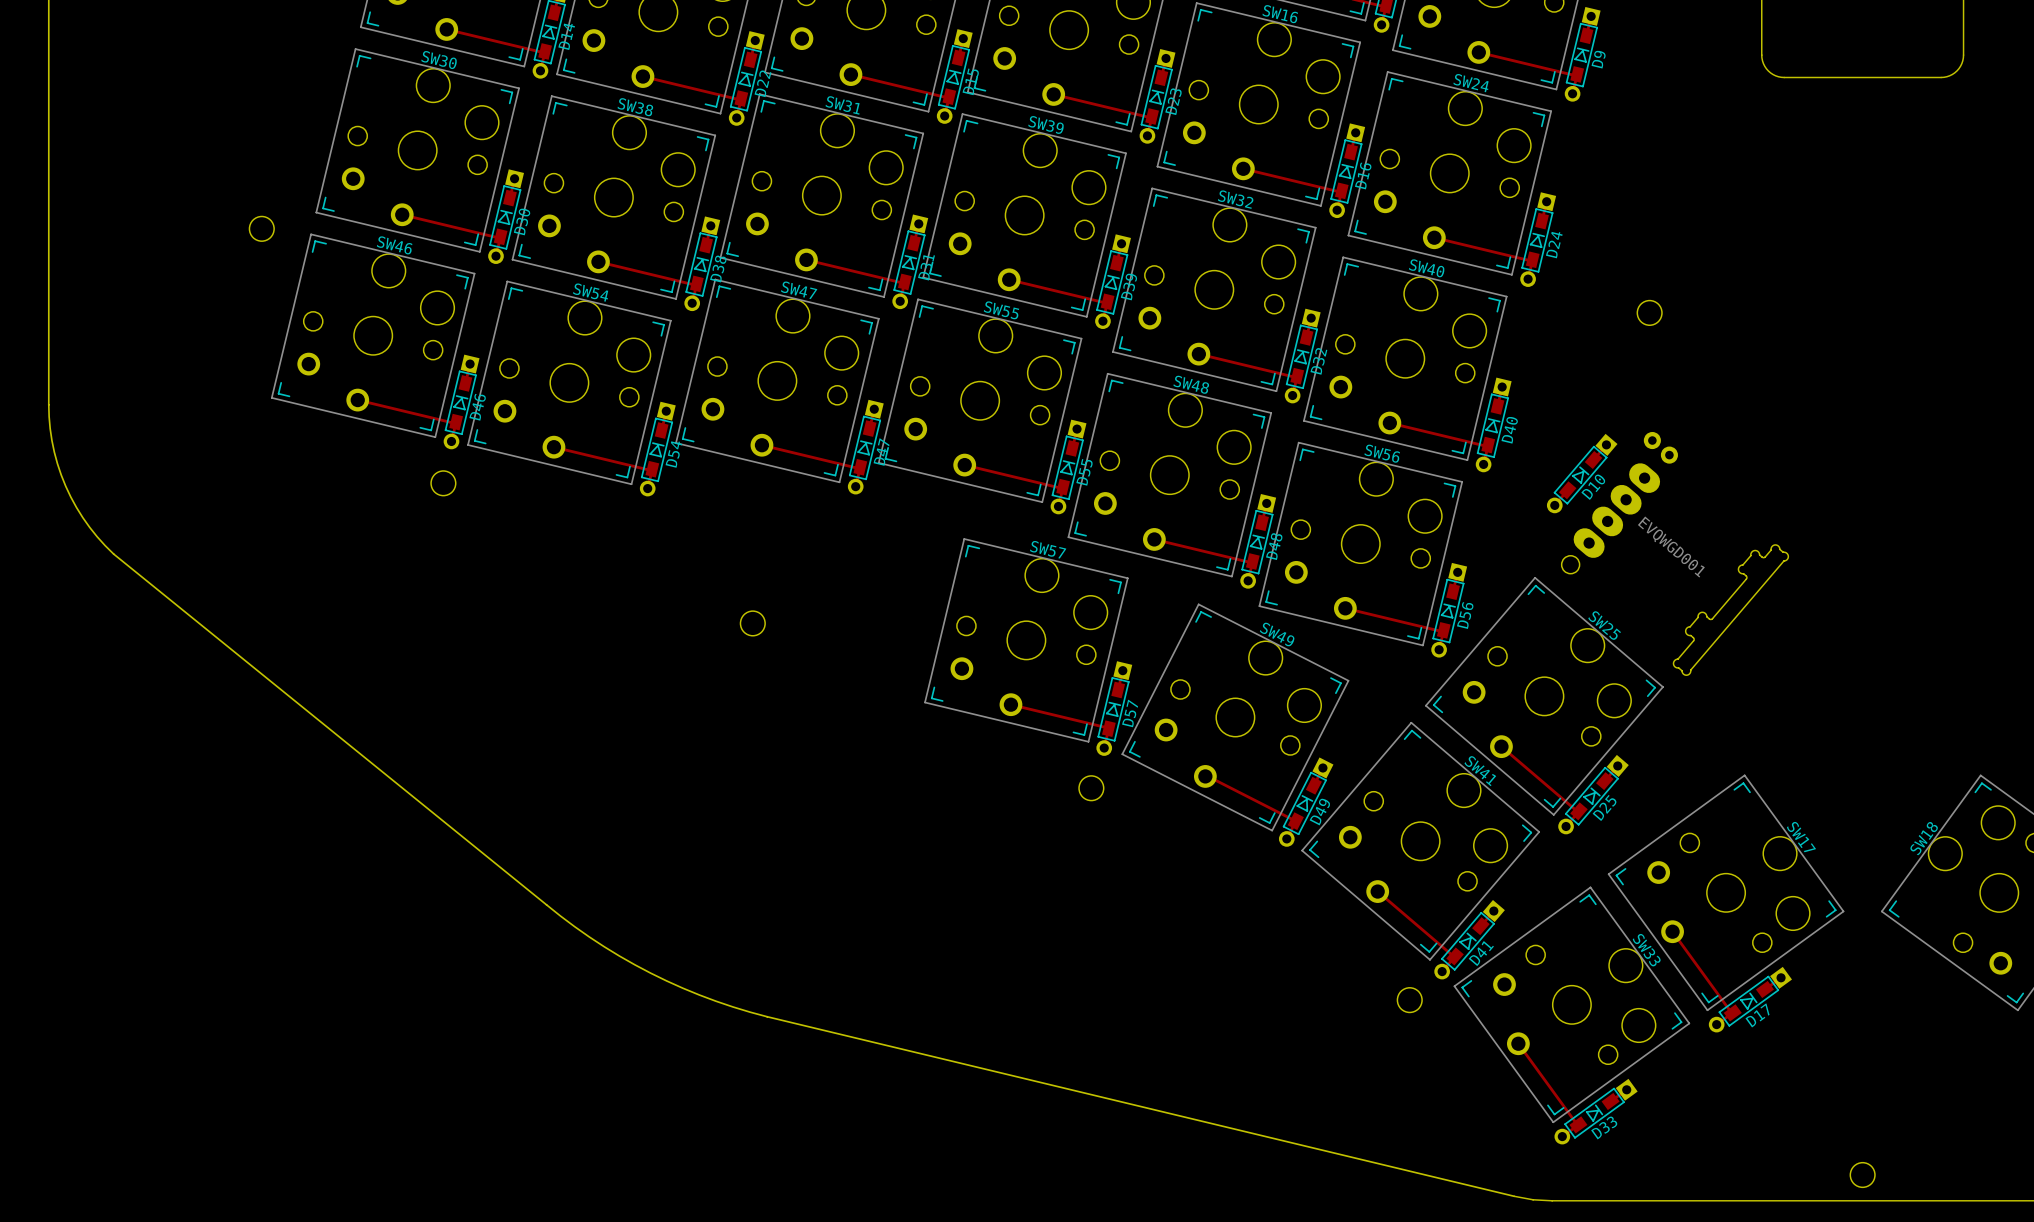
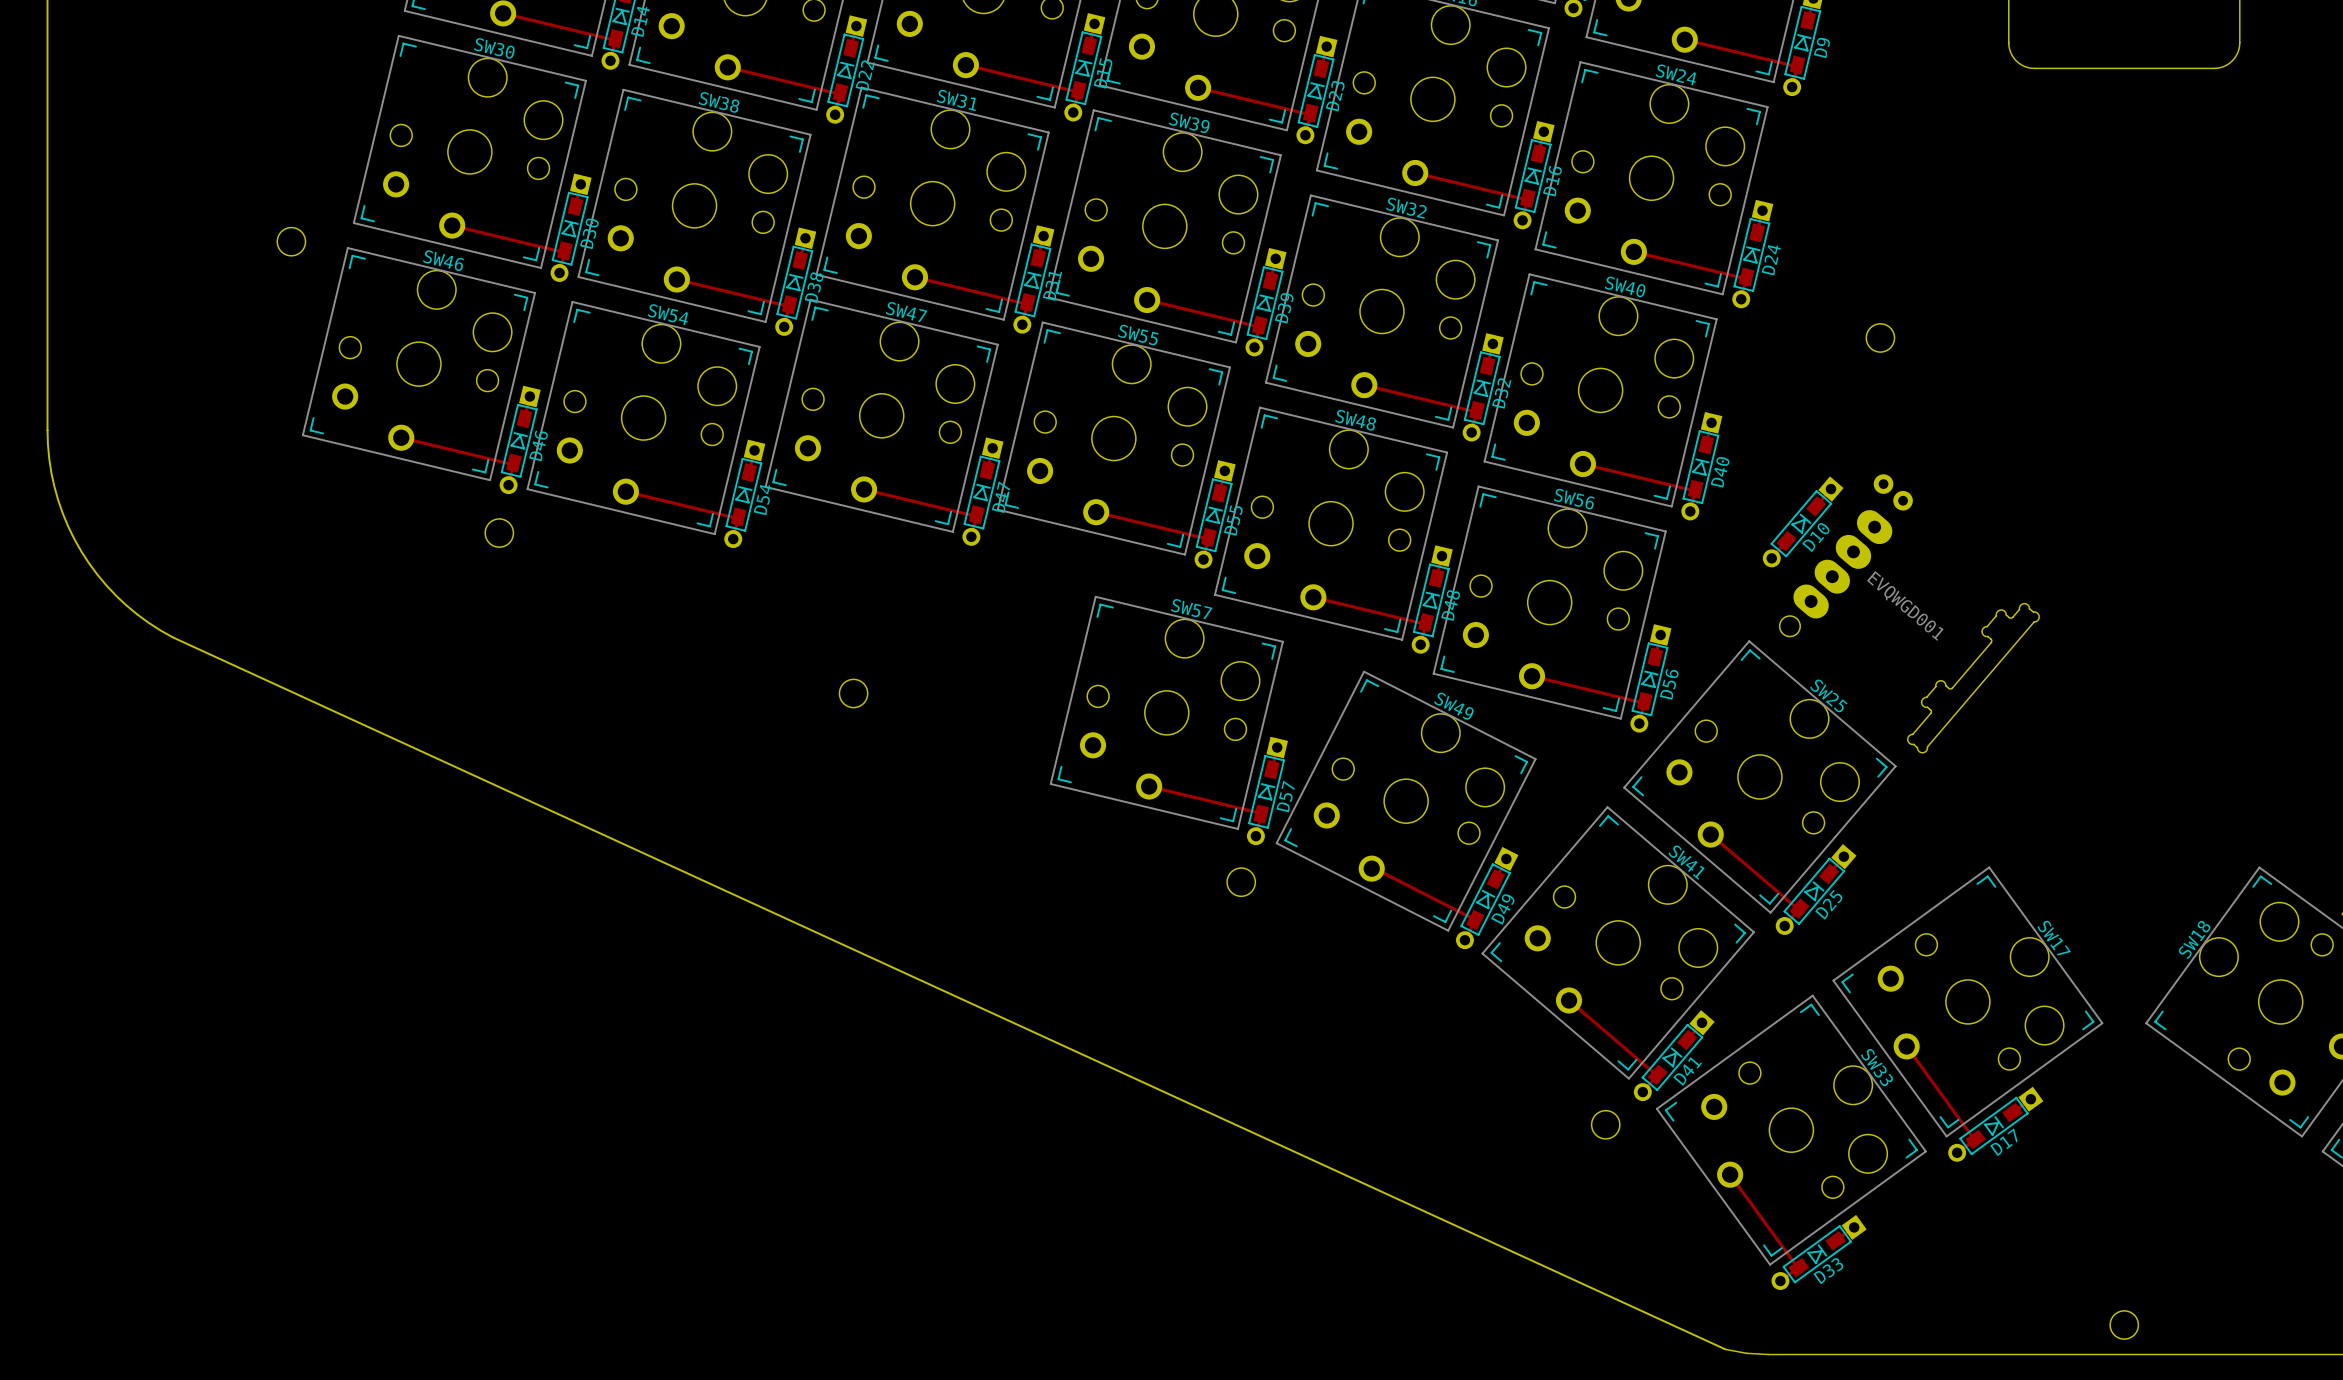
board edge: (48, 393) (51, 440) (65, 486) (82, 517) (113, 554) (560, 915) (604, 946) (634, 964) (699, 994) (767, 1016) (1514, 1196) -> (47, 430) (49, 458) (58, 499) (68, 526) (81, 551) (106, 585) (126, 605) (148, 622) (172, 637) (1725, 1349)

